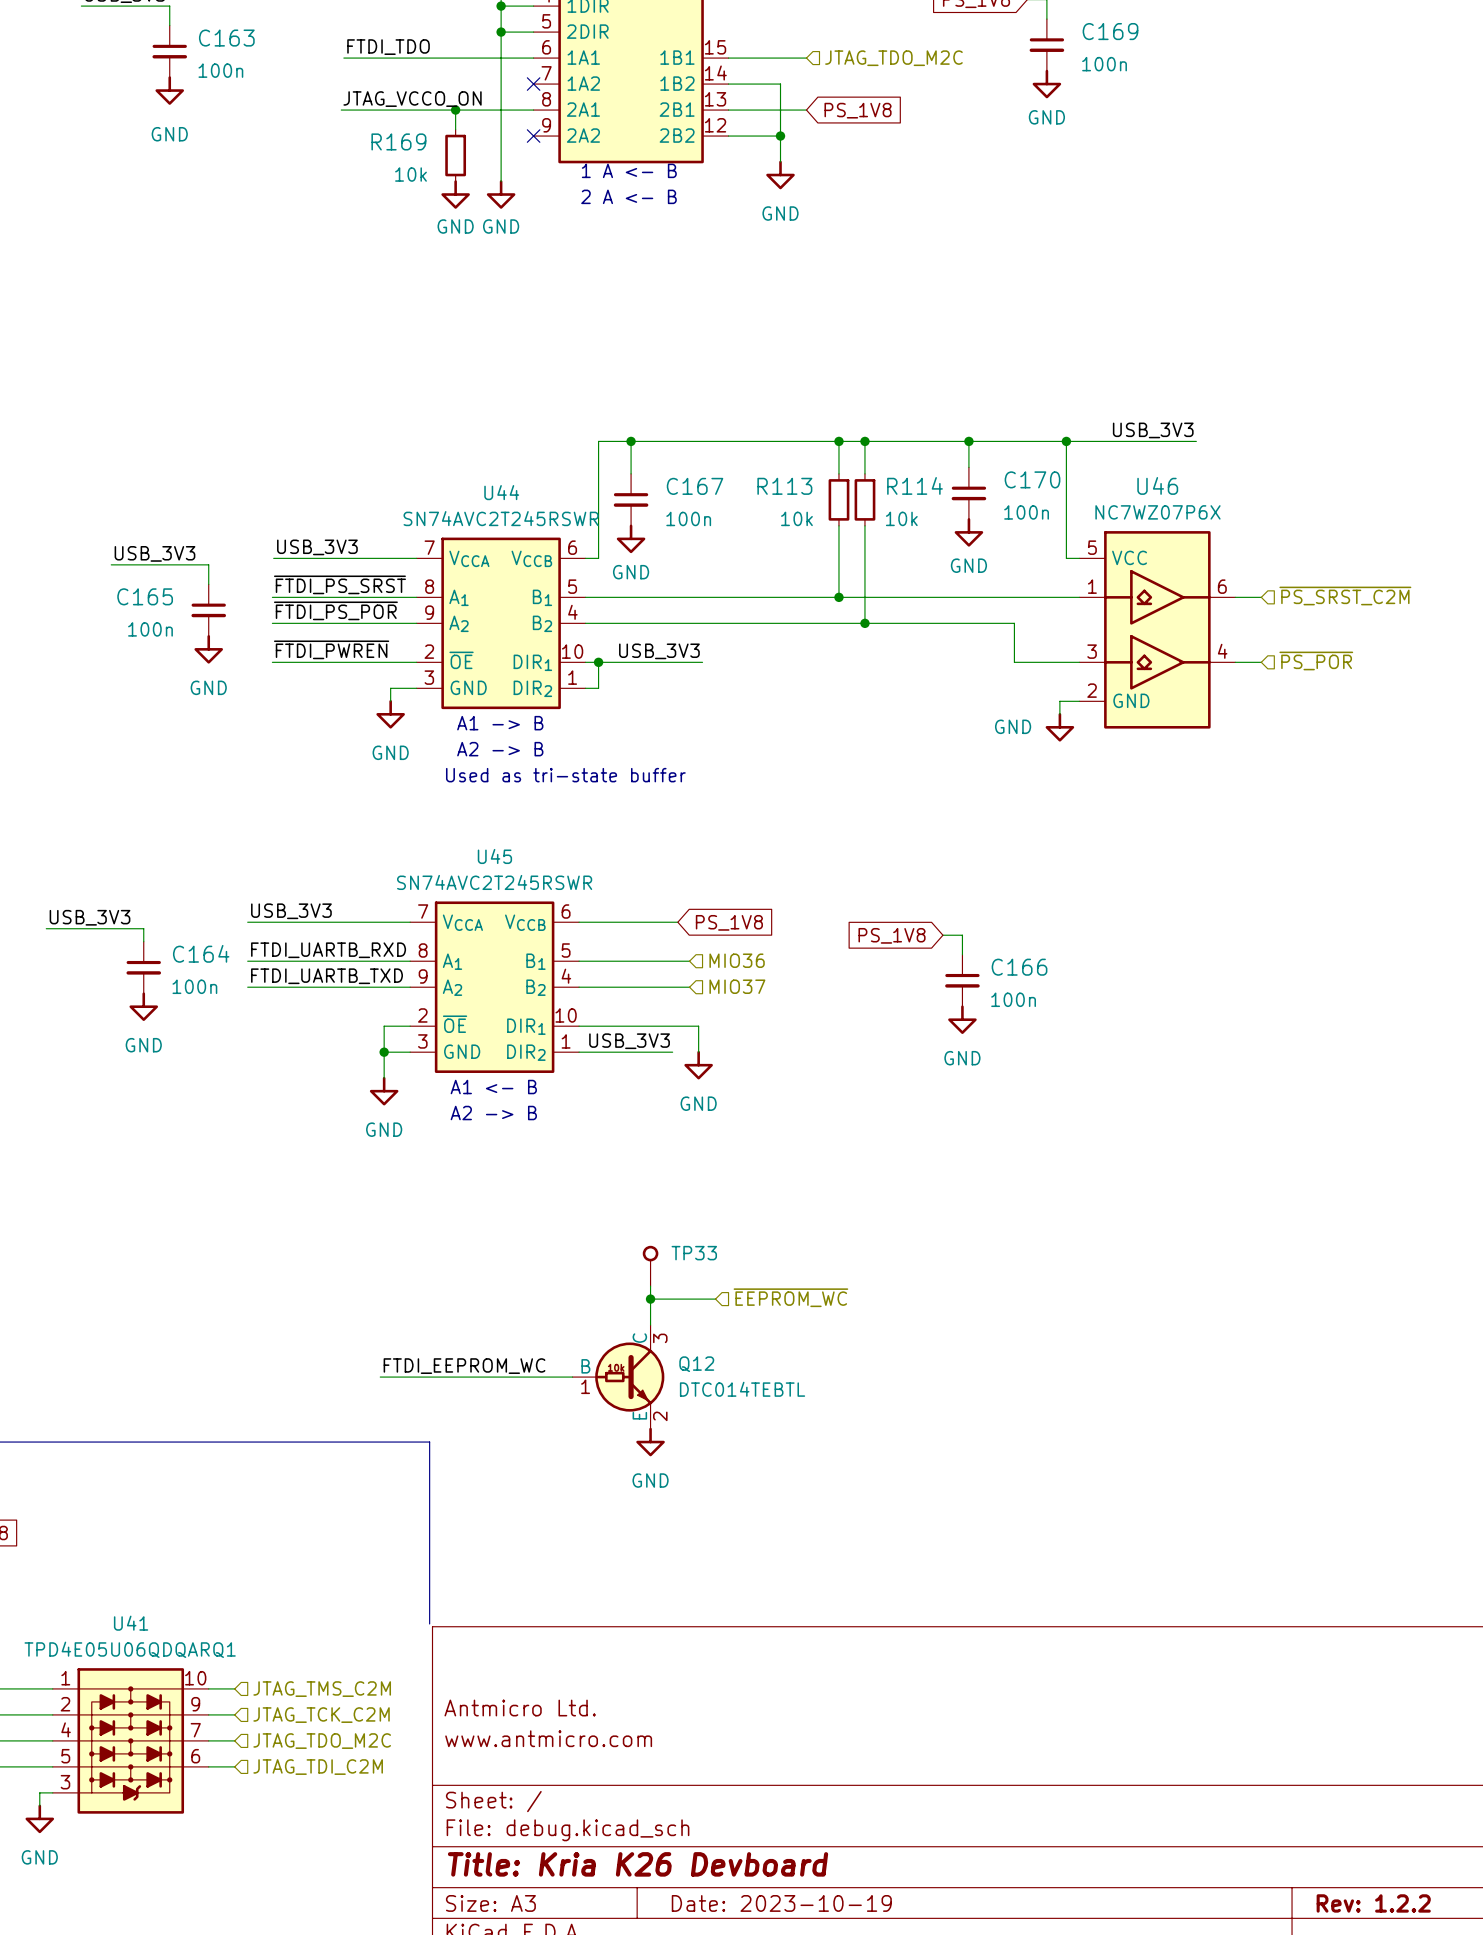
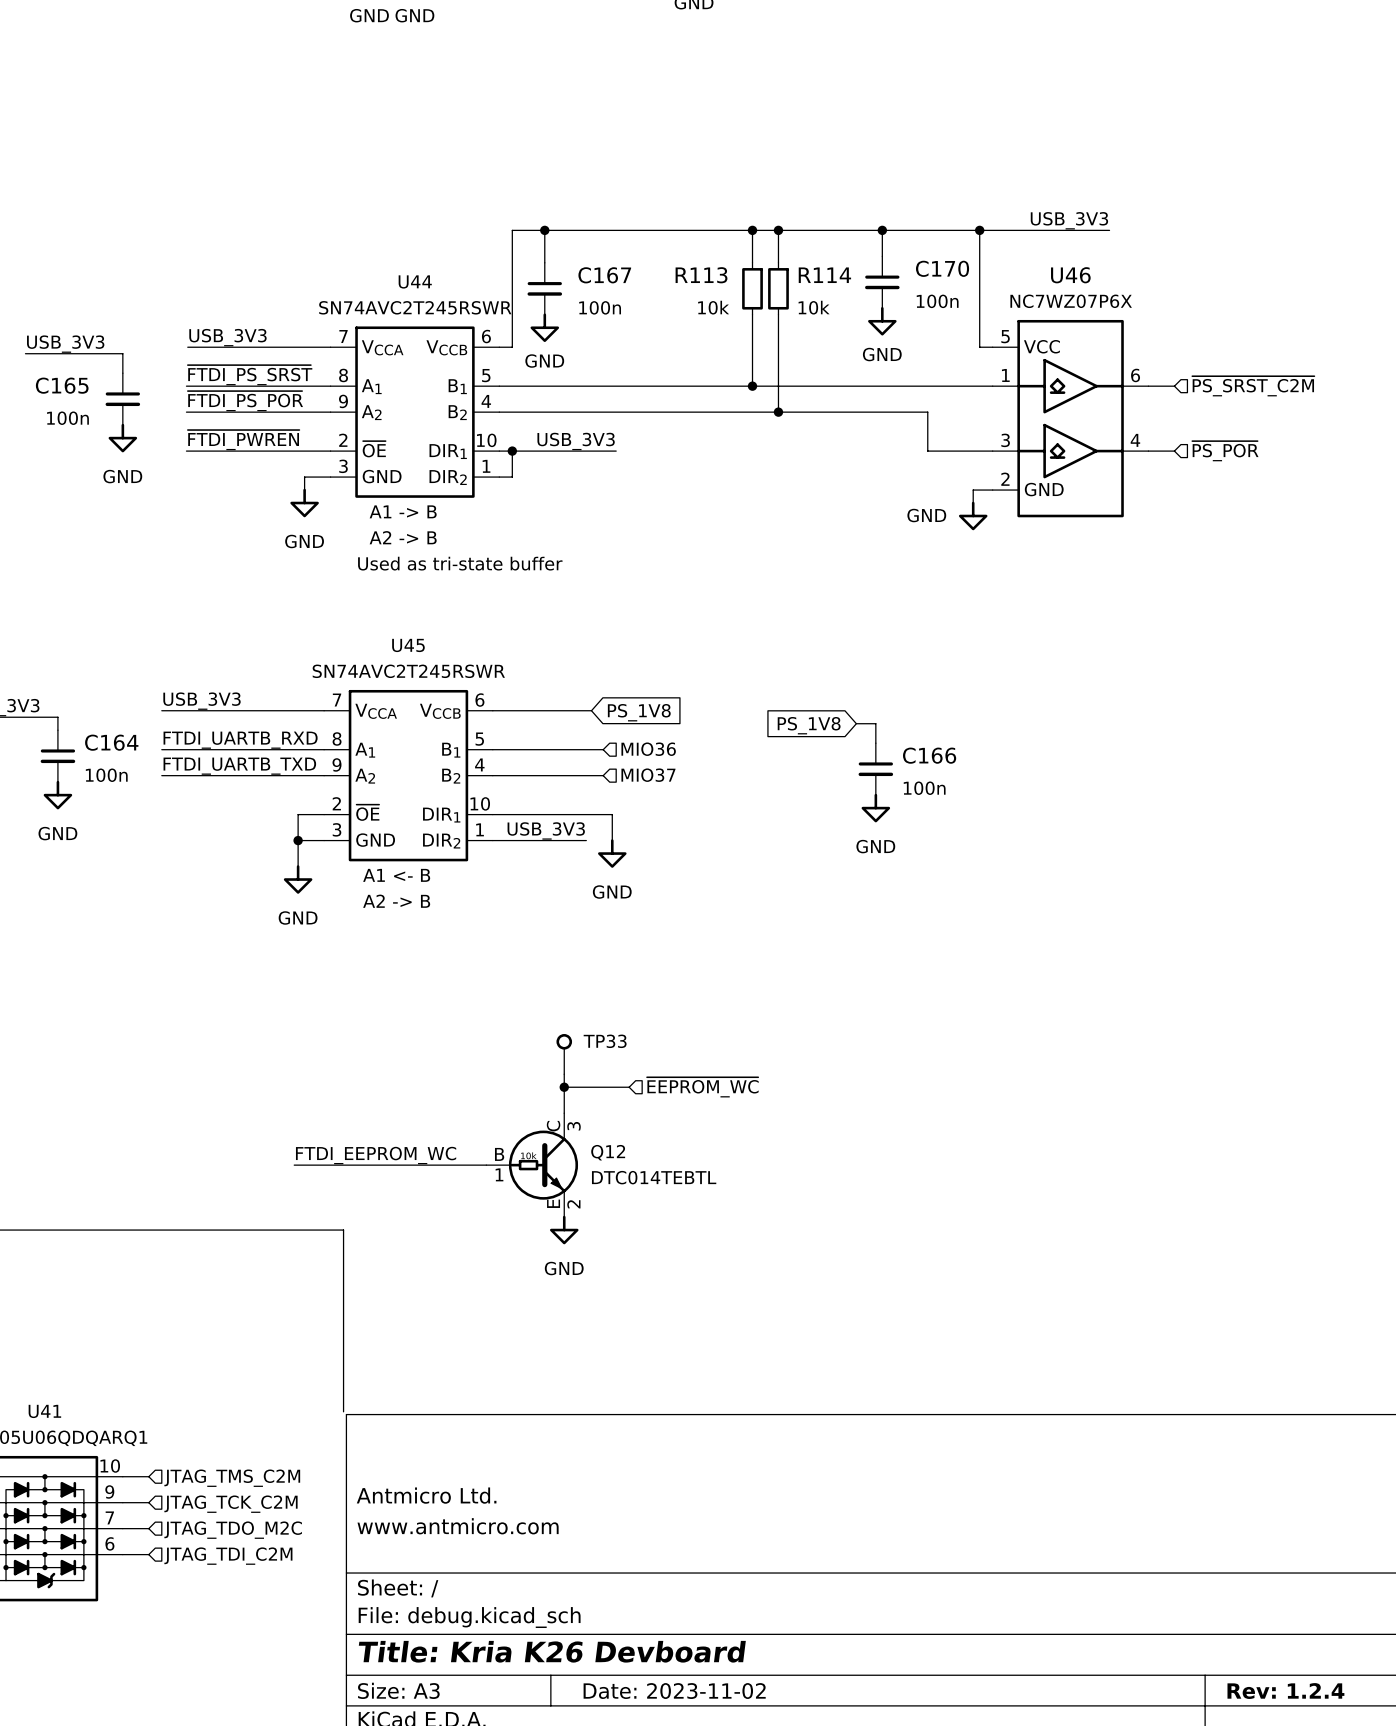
title block: Date: 2023-10-19 (781, 1903) -> Date: 2023-11-02 (674, 1691)
title block: Rev: 1.2.2 (1373, 1903) -> Rev: 1.2.4 (1285, 1691)

